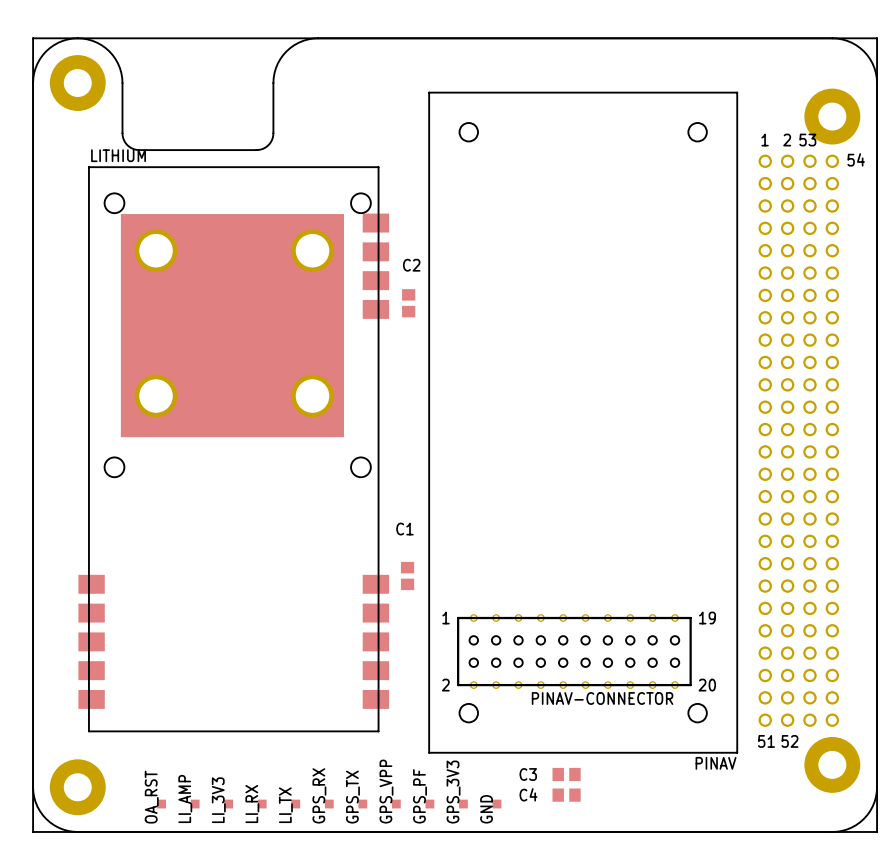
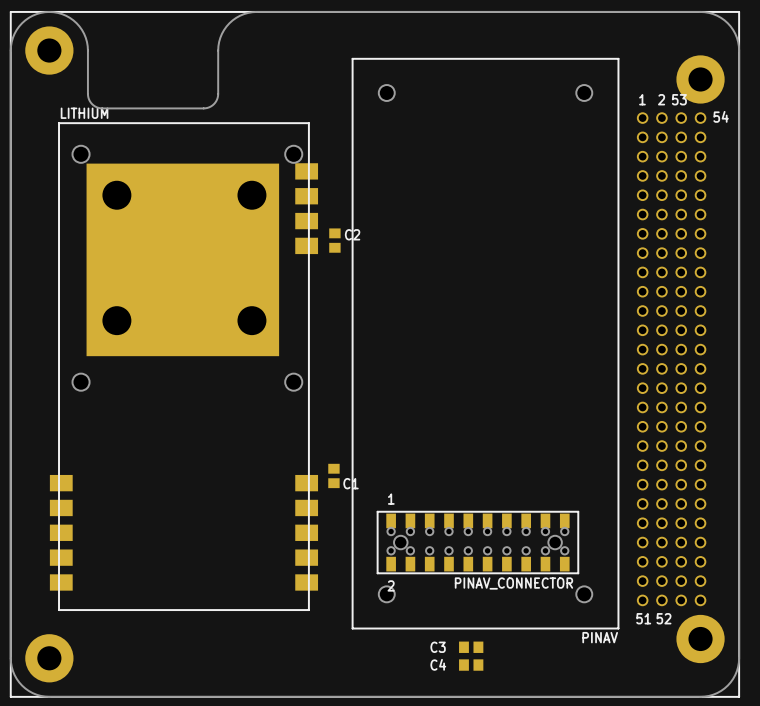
C2 name position: C2 (411, 265) -> C2 (352, 234)
C1 name position: C1 (404, 529) -> C1 (351, 483)
PINAV-CONNECTOR: (574, 651) -> none
PINAV_CONNECTOR: none -> (477, 542)
OA_RST: (161, 804) -> none
LI_AMP: (195, 804) -> none
LI_3V3: (228, 804) -> none
LI_RX: (262, 804) -> none
LI_TX: (295, 804) -> none
GPS_RX: (329, 804) -> none
GPS_TX: (362, 804) -> none
GPS_VPP: (396, 804) -> none
GPS_PF: (429, 804) -> none
GPS_3V3: (463, 804) -> none
GND: (496, 804) -> none

